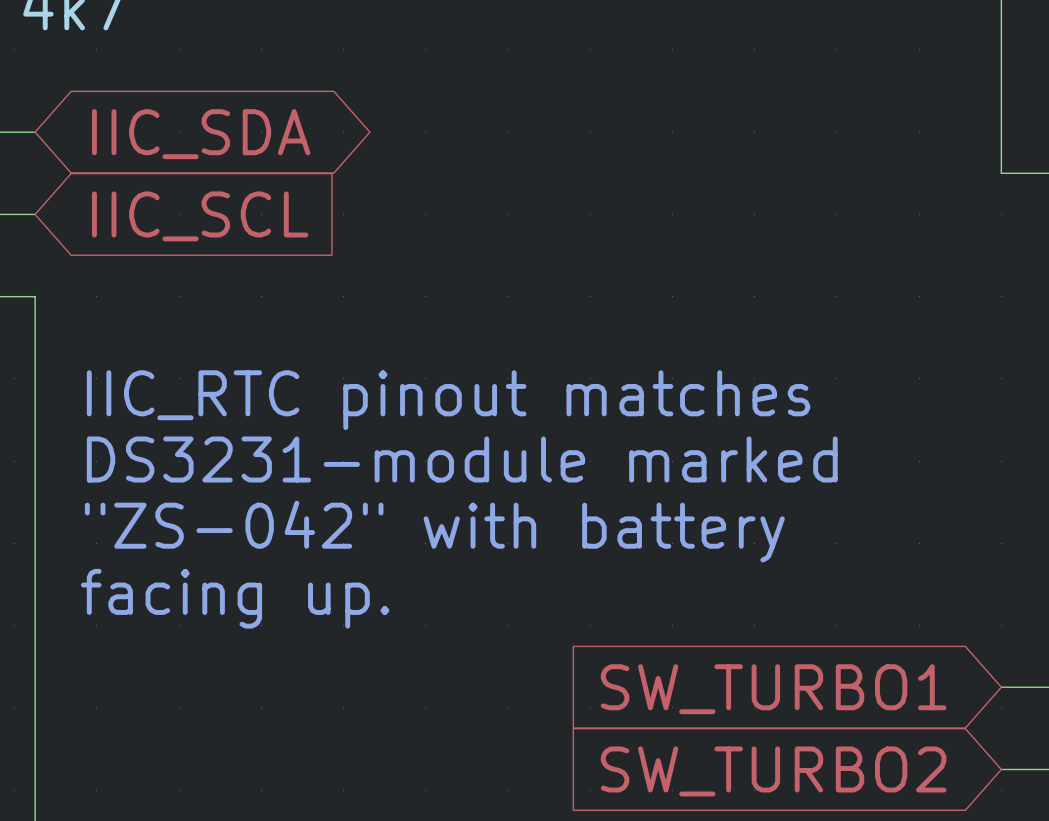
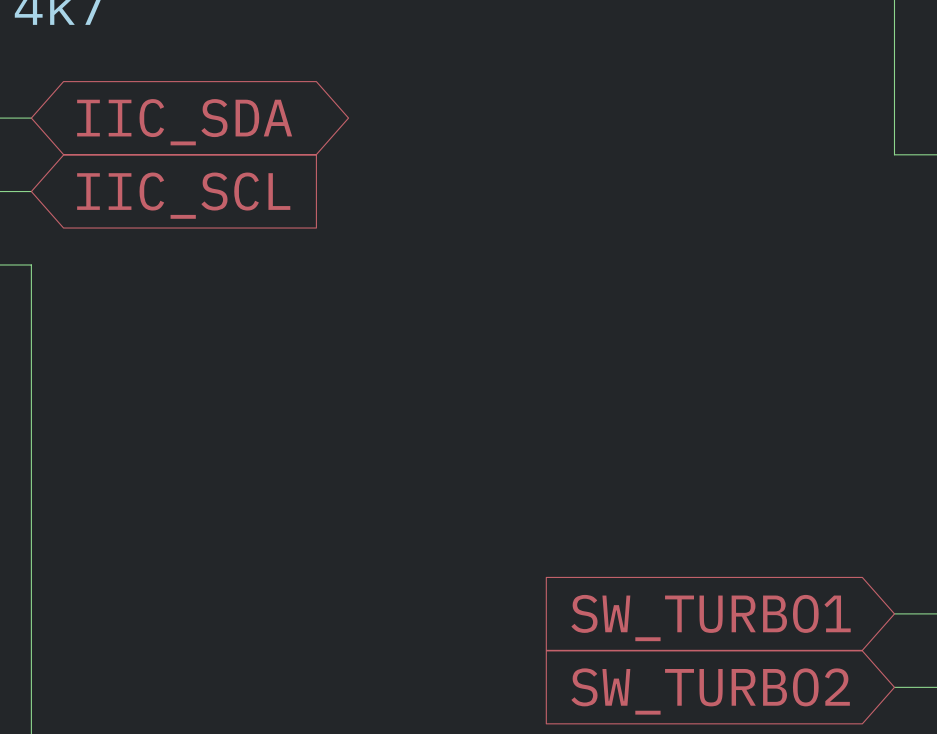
text: IIC_RTC pinout matches (448, 400) -> none
text: DS3231-module marked (462, 459) -> none
text: "ZS-042" with battery (434, 531) -> none
text: facing up. (235, 598) -> none

